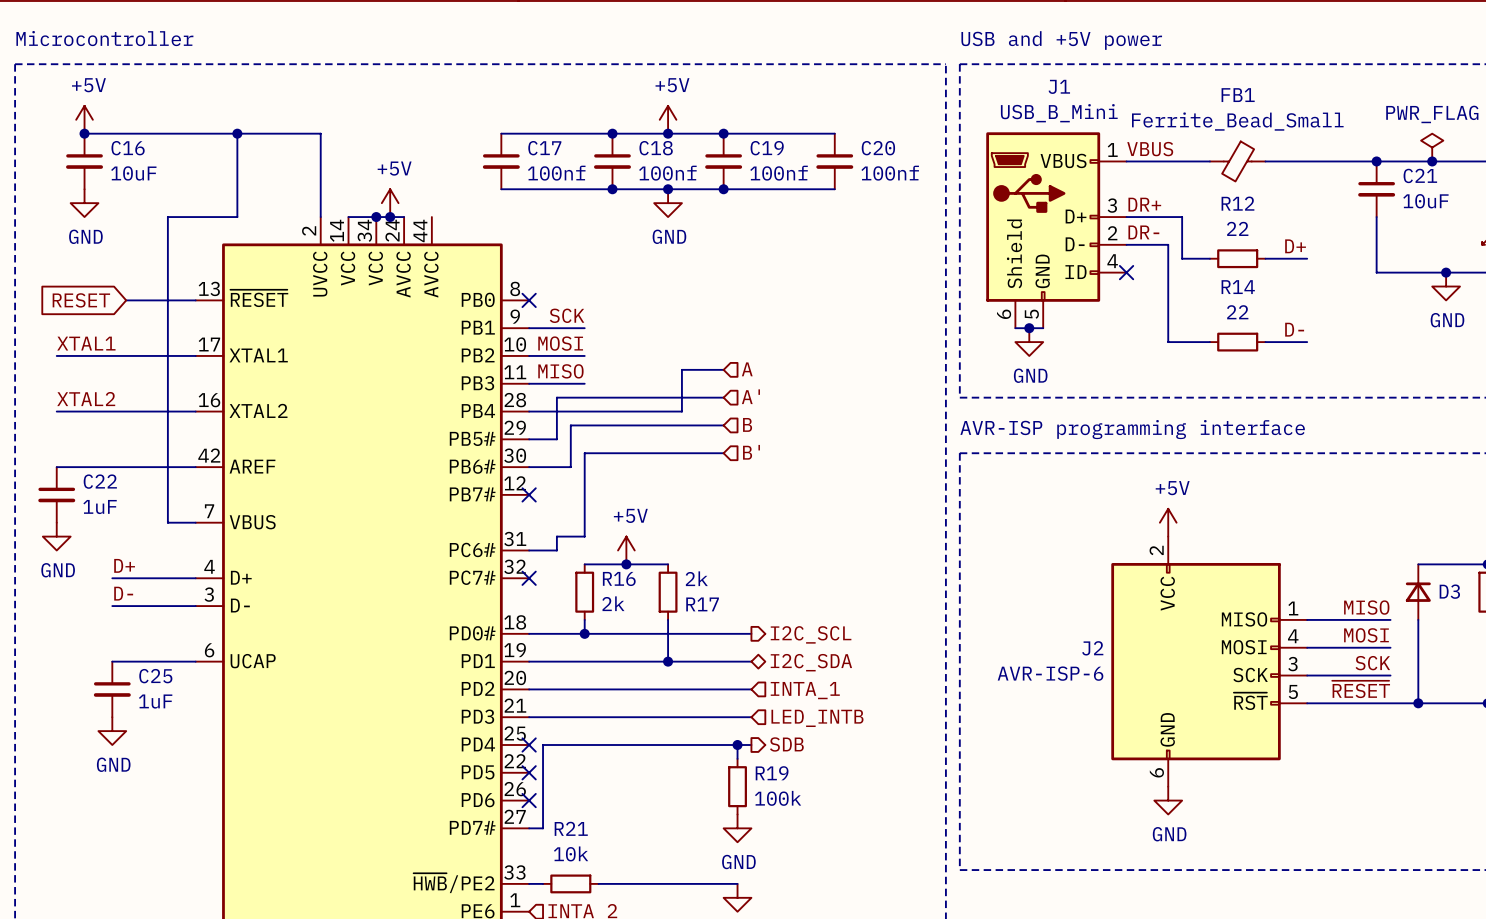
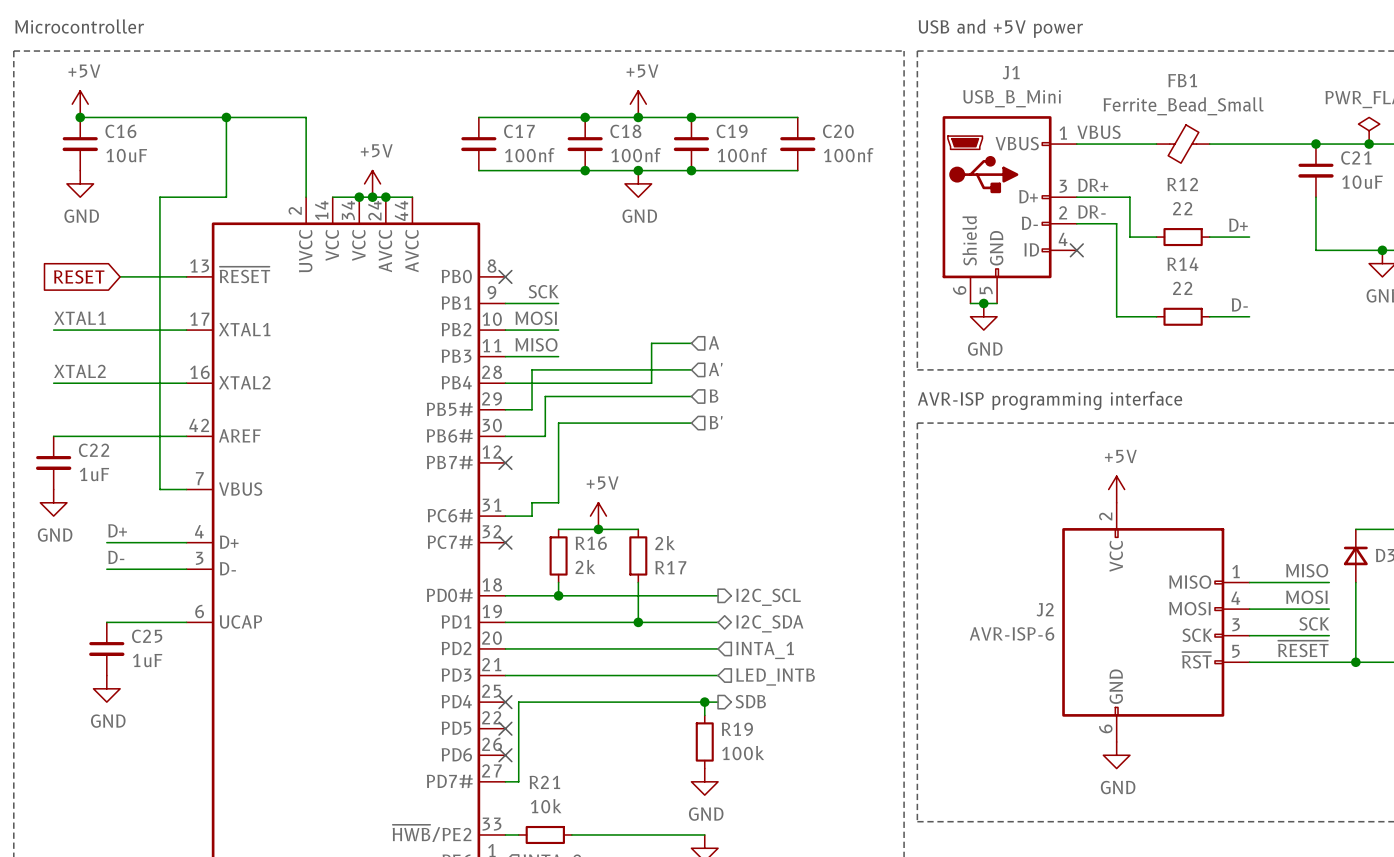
wire: none -> (385, 197) (412, 197)
junction: none -> (385, 197)

